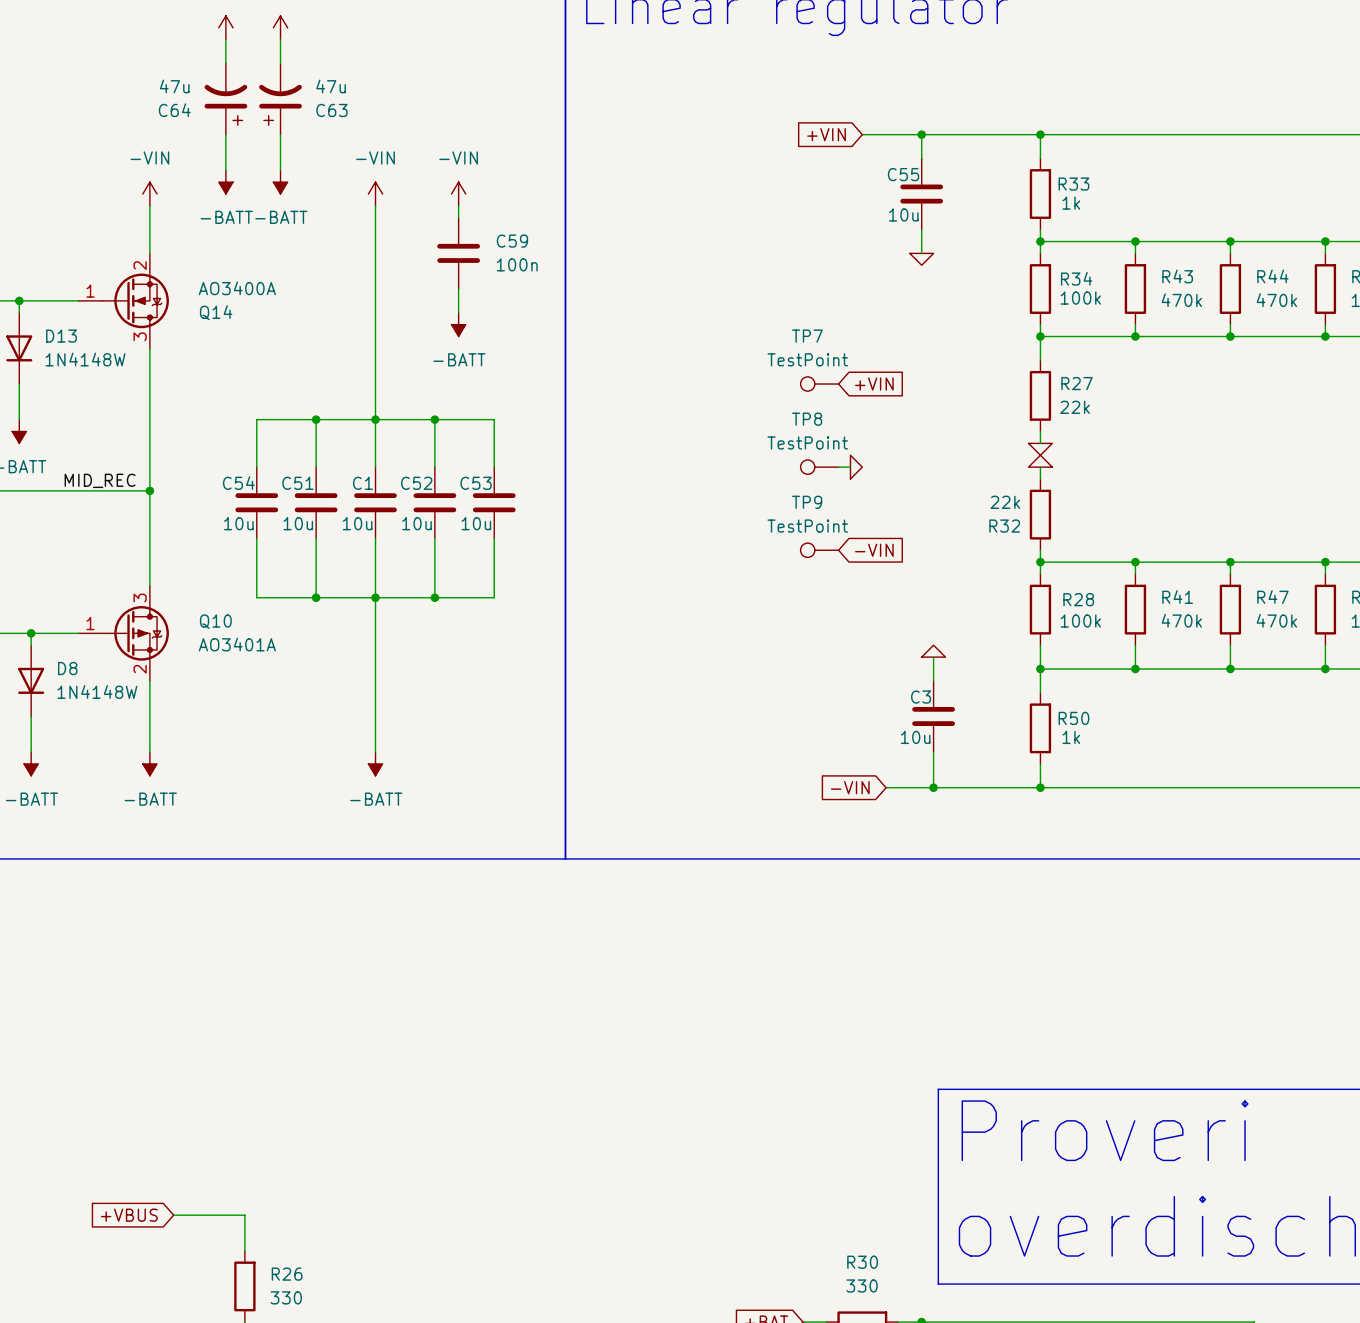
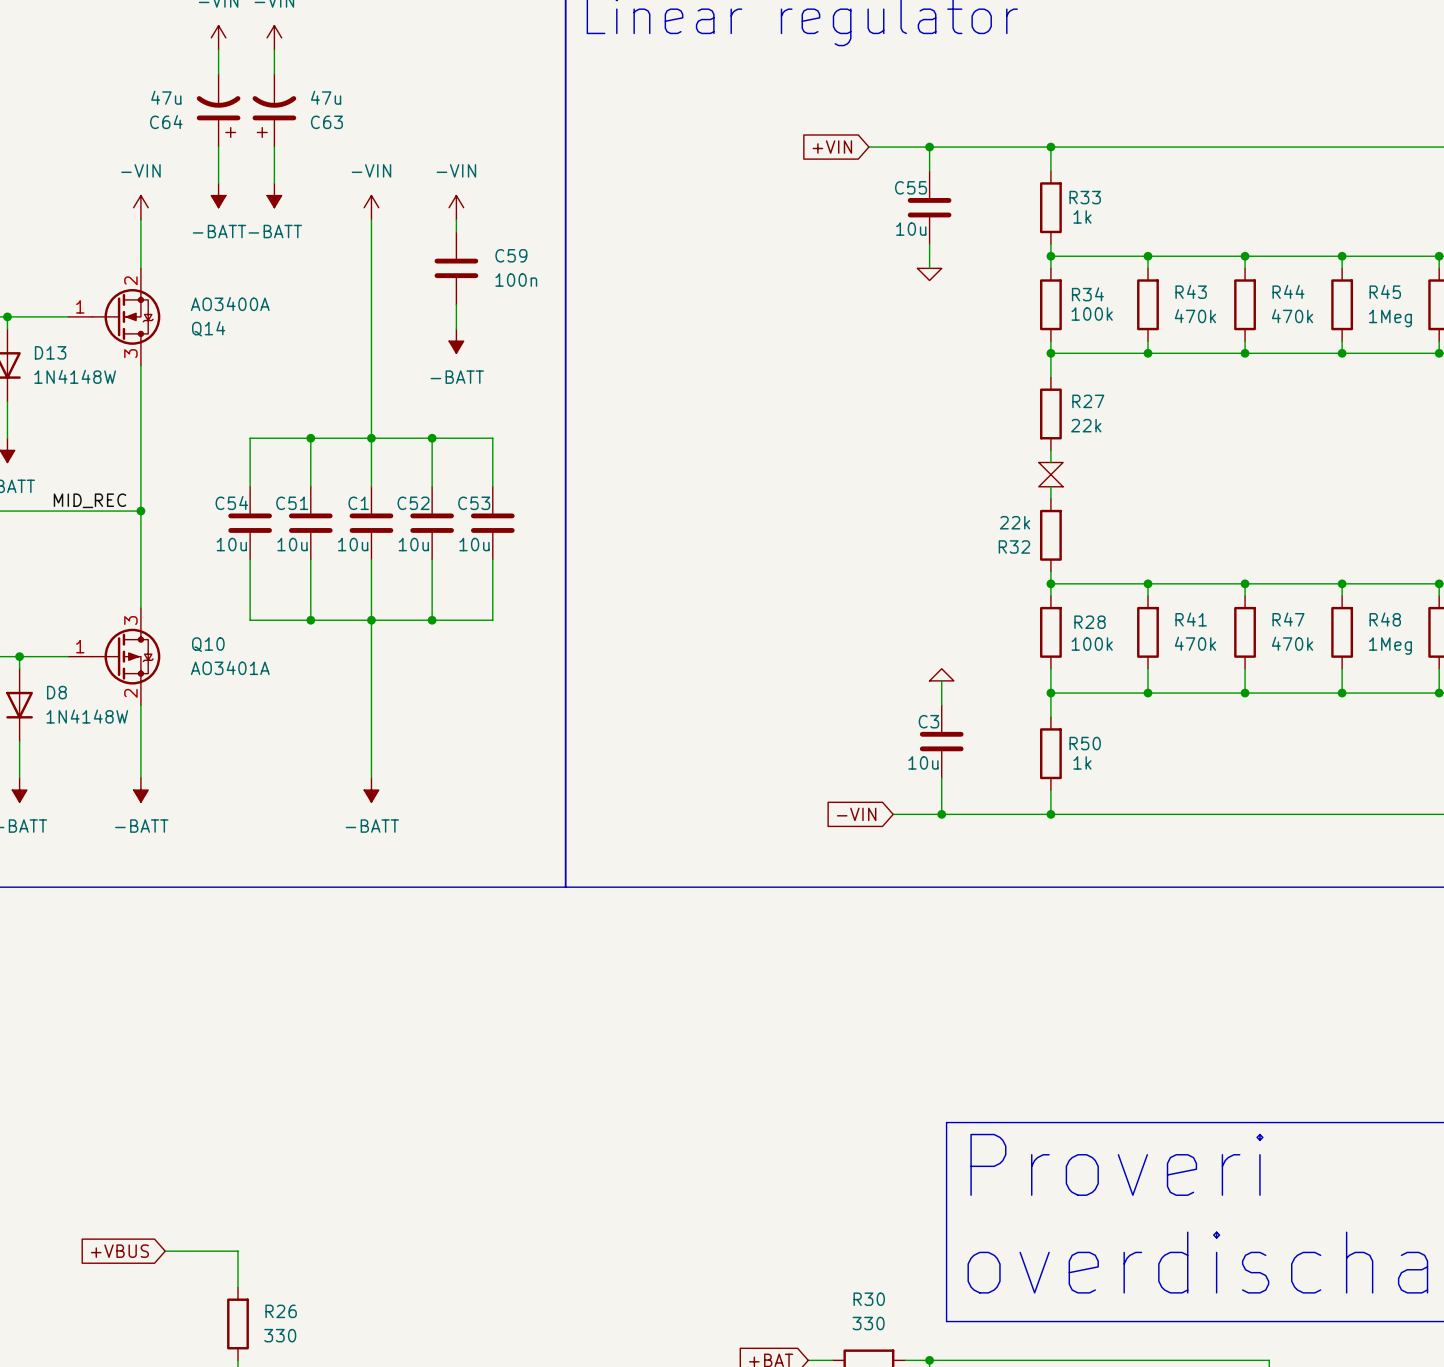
TP7: TestPoint (819, 384) -> none
global label: +VIN (874, 384) -> none
TP8: TestPoint (819, 467) -> none
wire: (838, 467) (850, 467) -> none
power symbol: (856, 467) -> none
TP9: TestPoint (819, 550) -> none
global label: -VIN (874, 550) -> none

